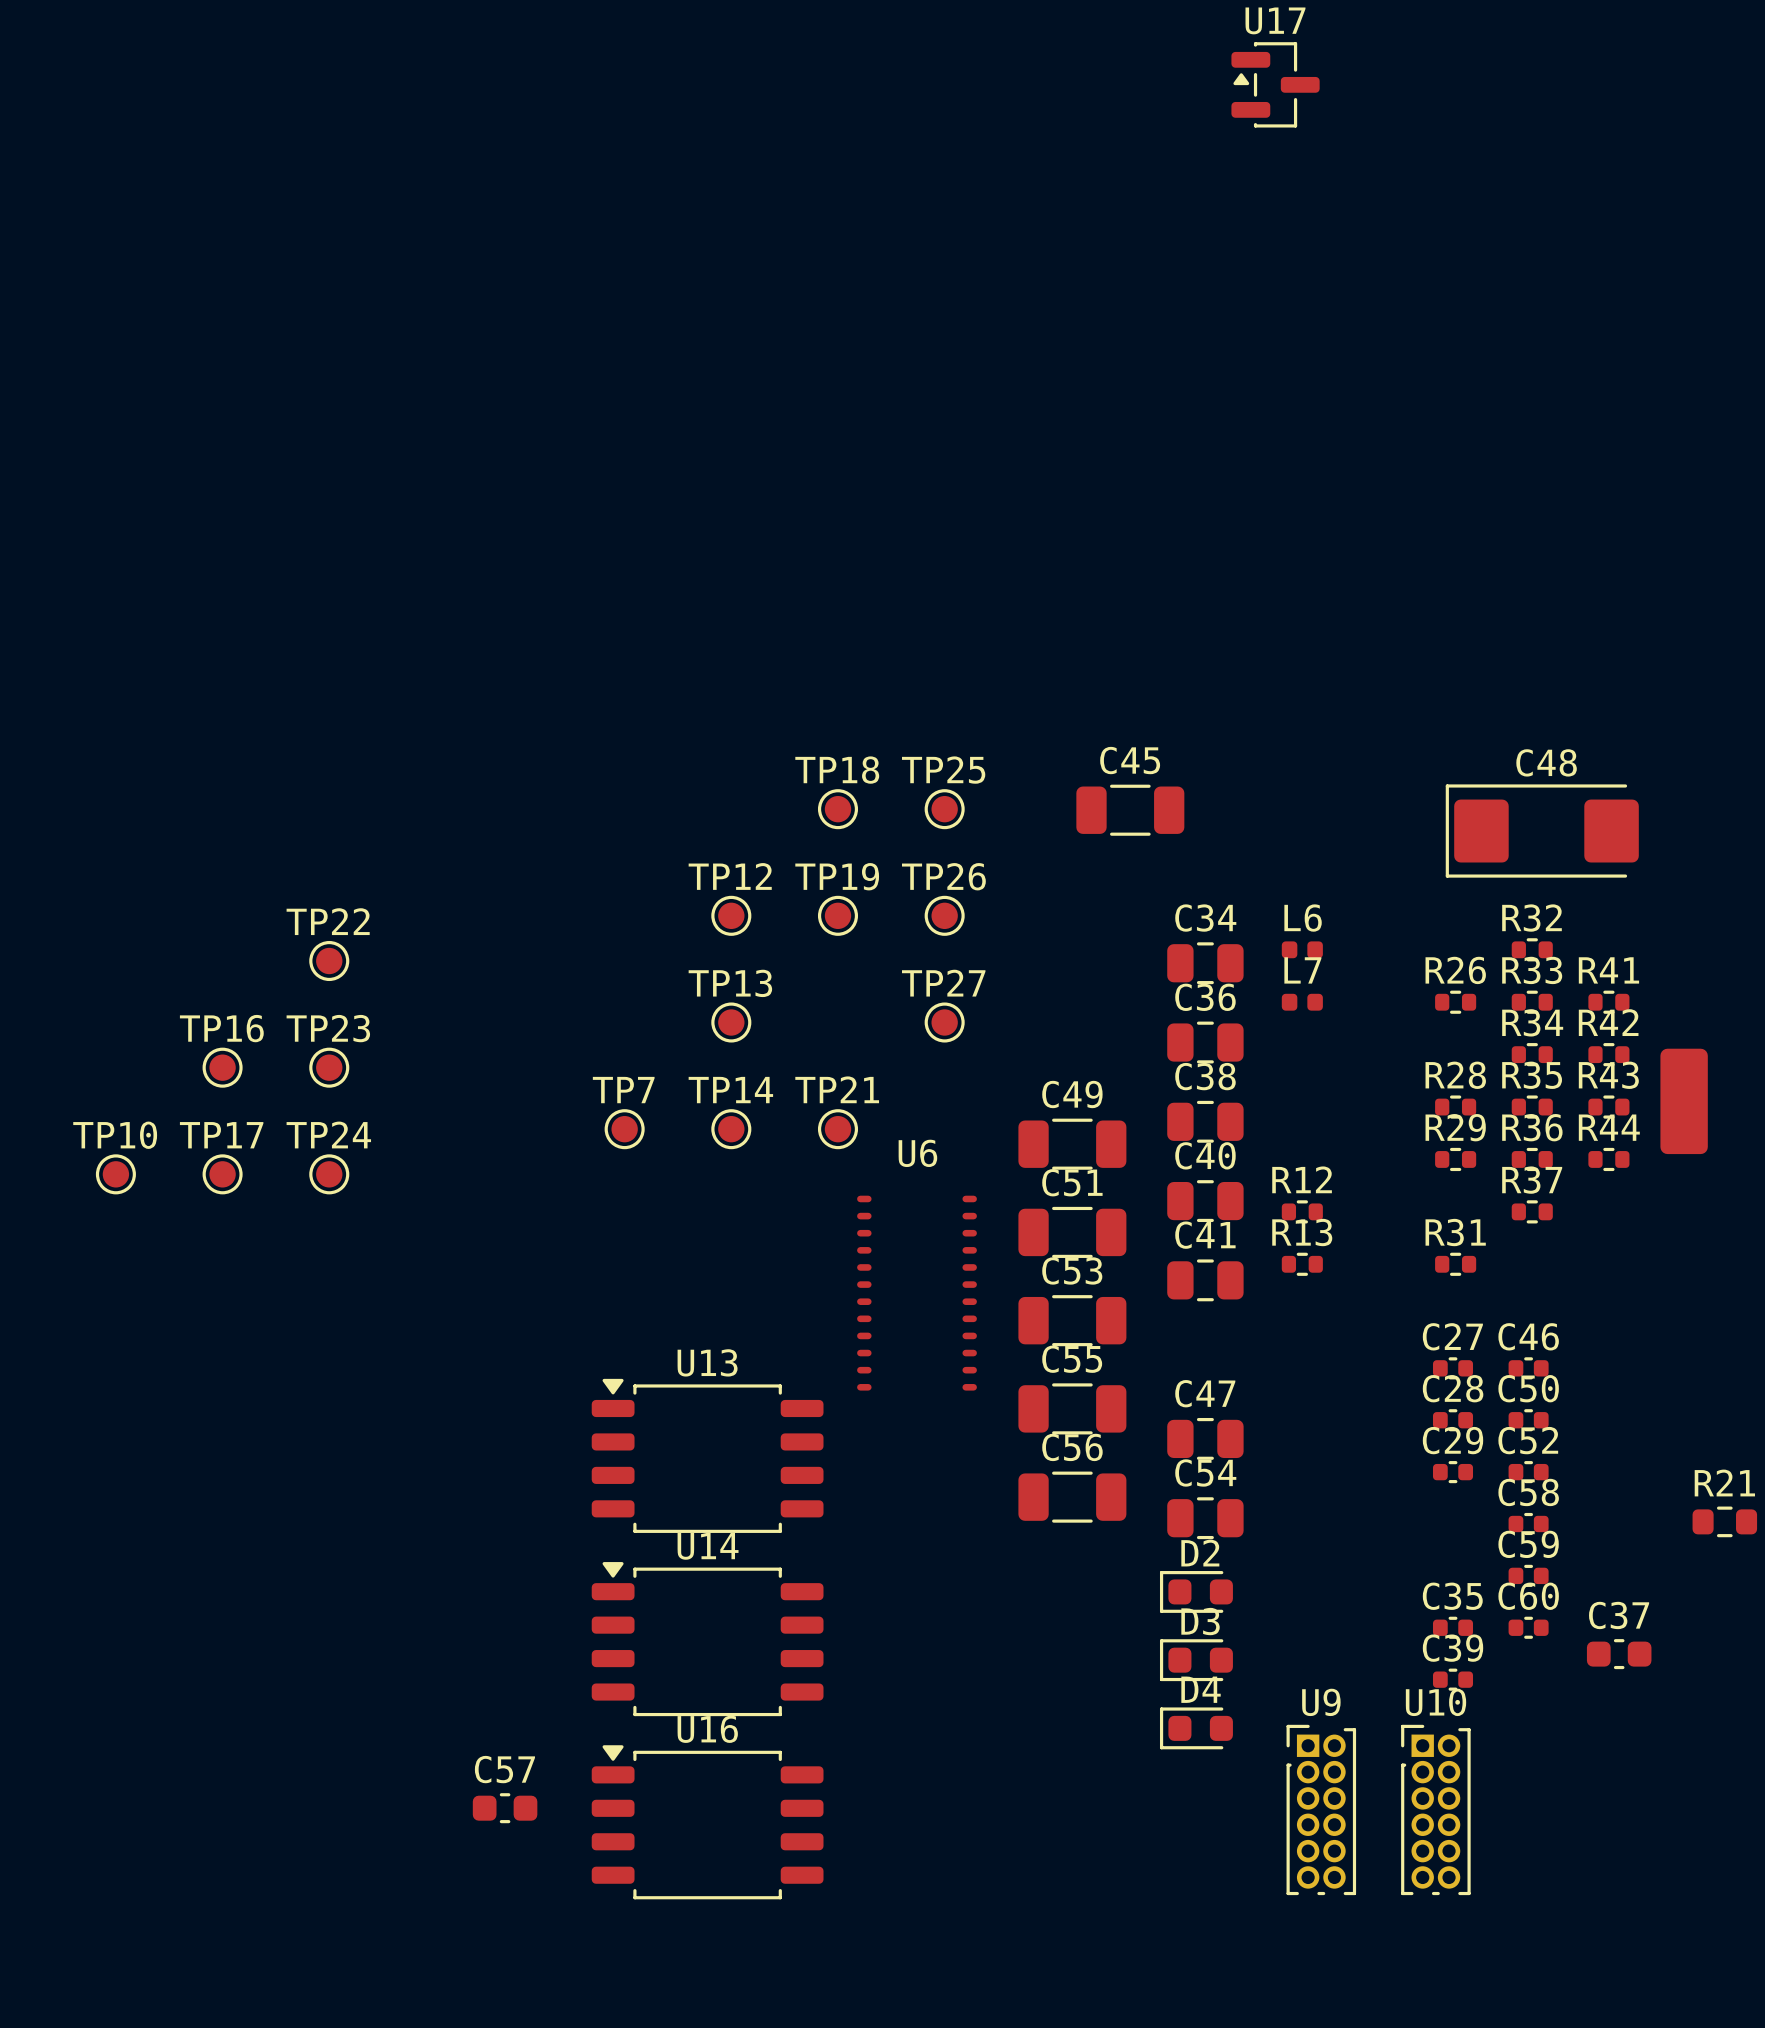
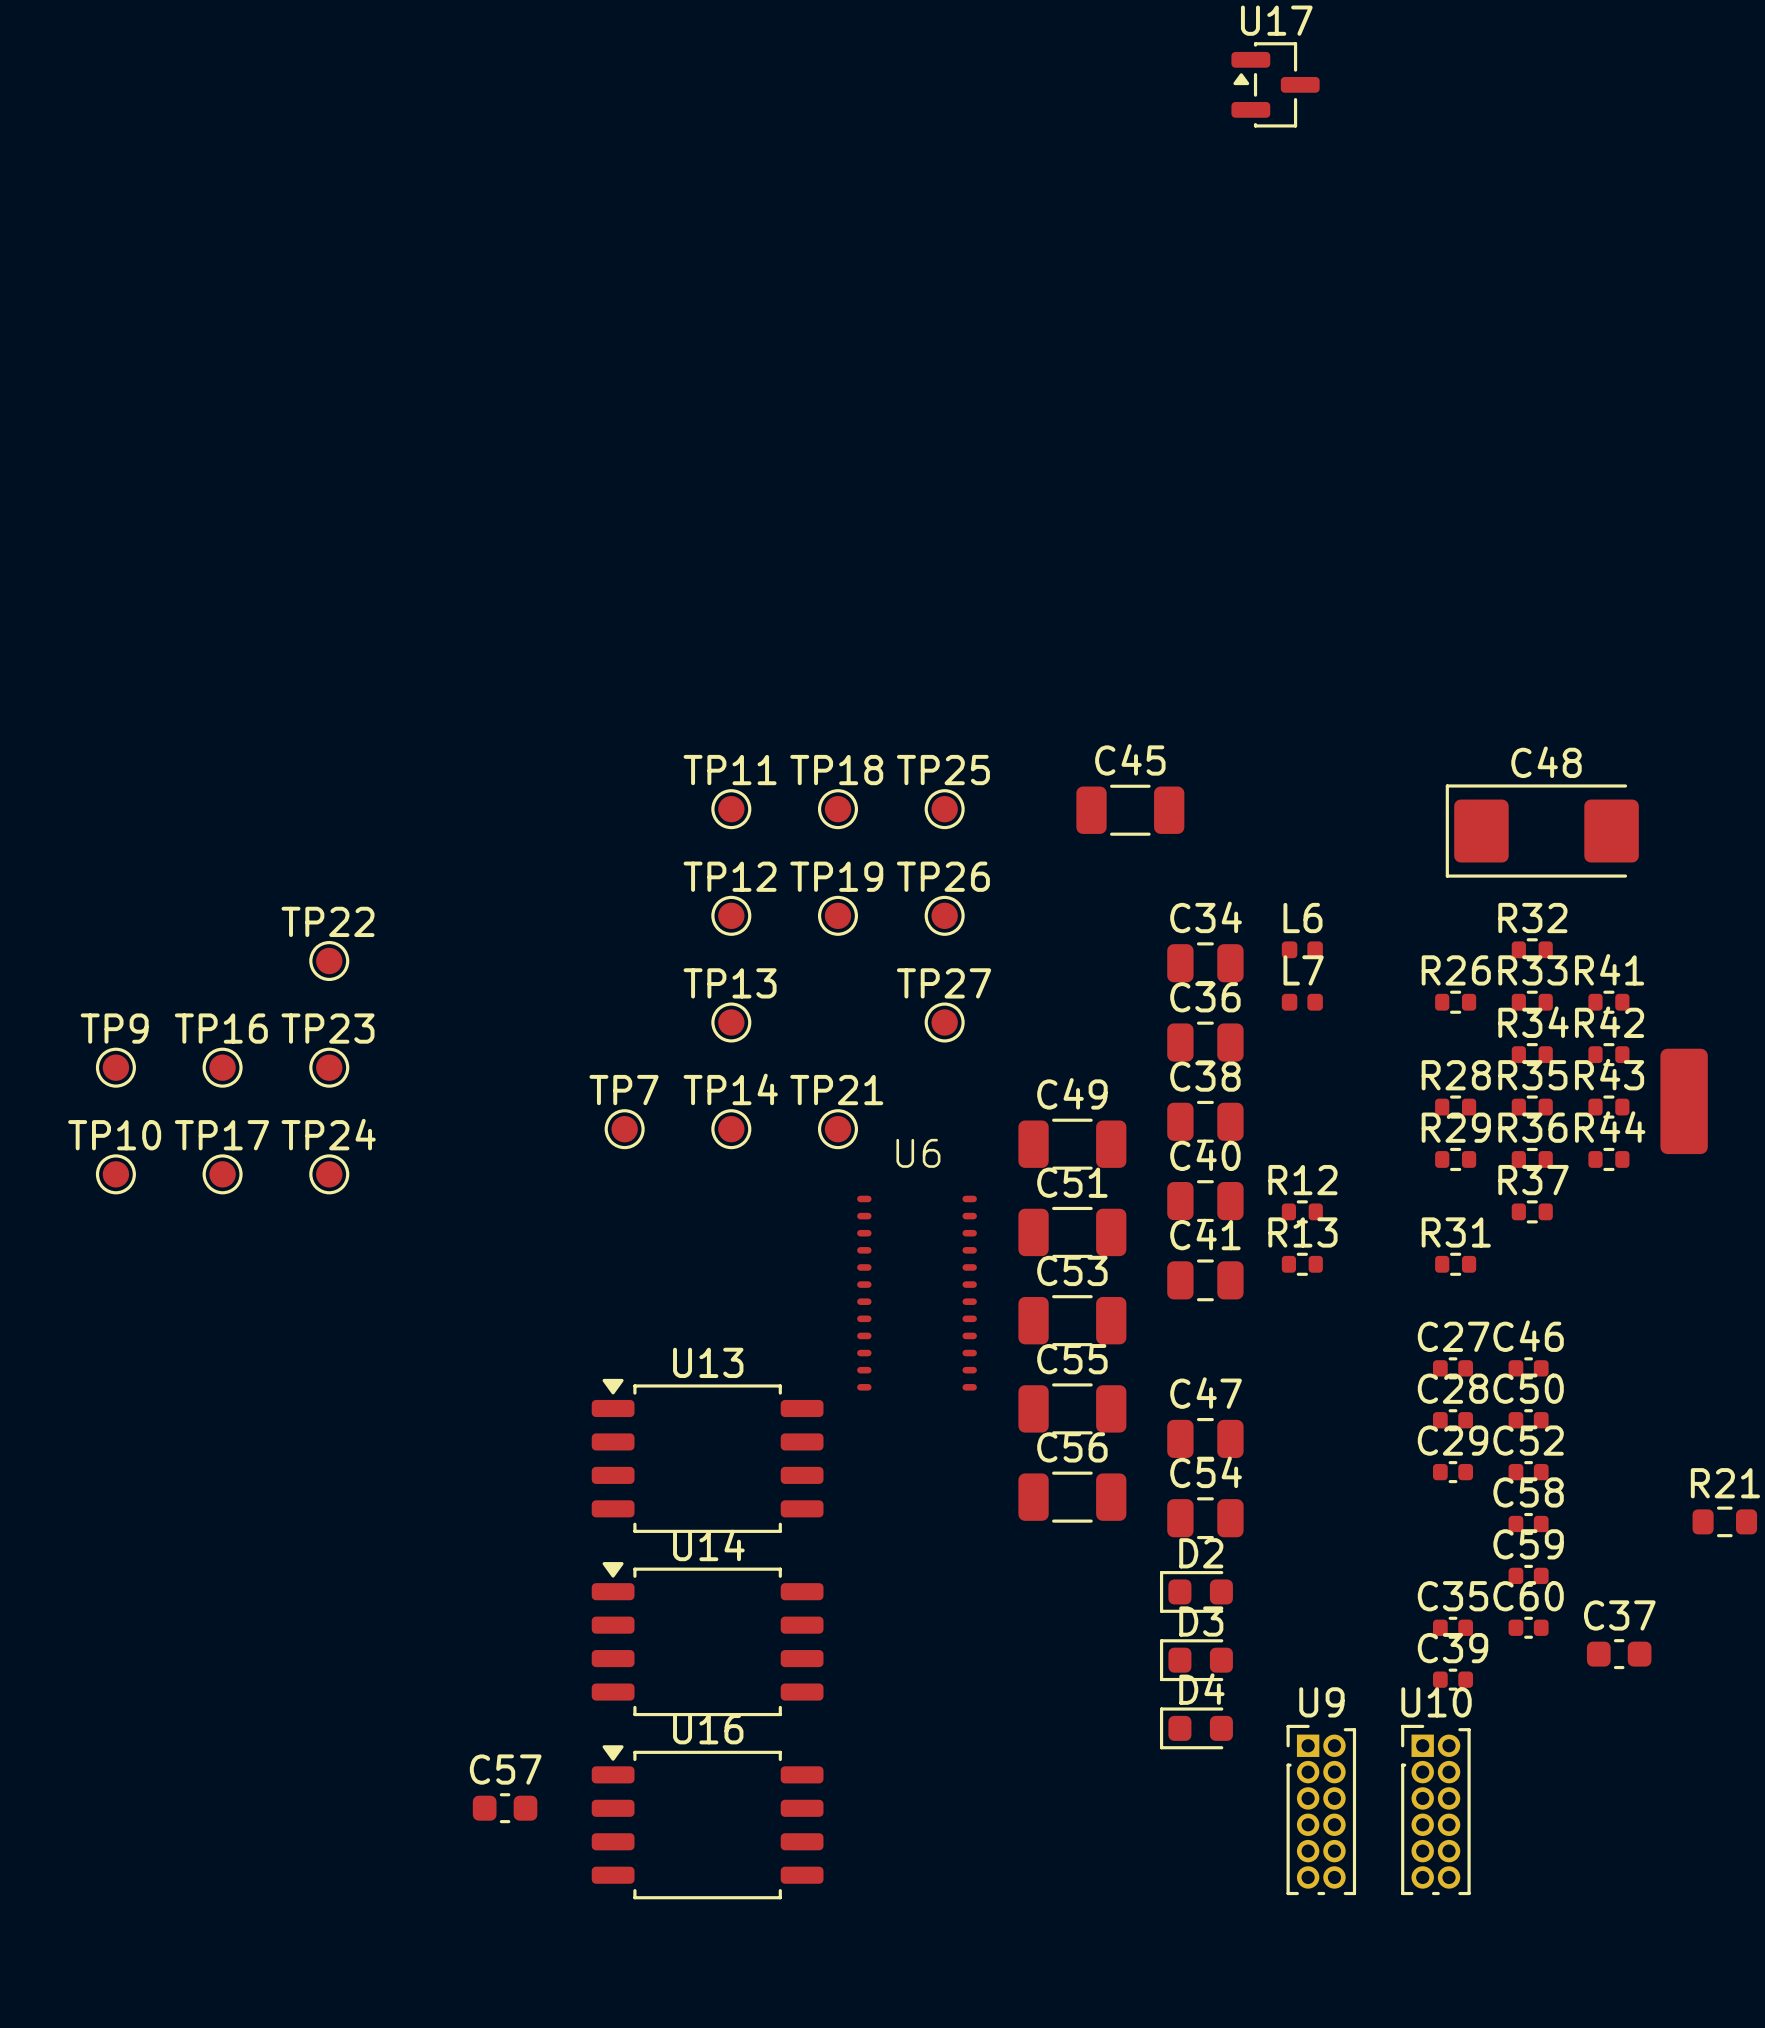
TP11: none -> (731, 809)
TP9: none -> (115, 1067)

